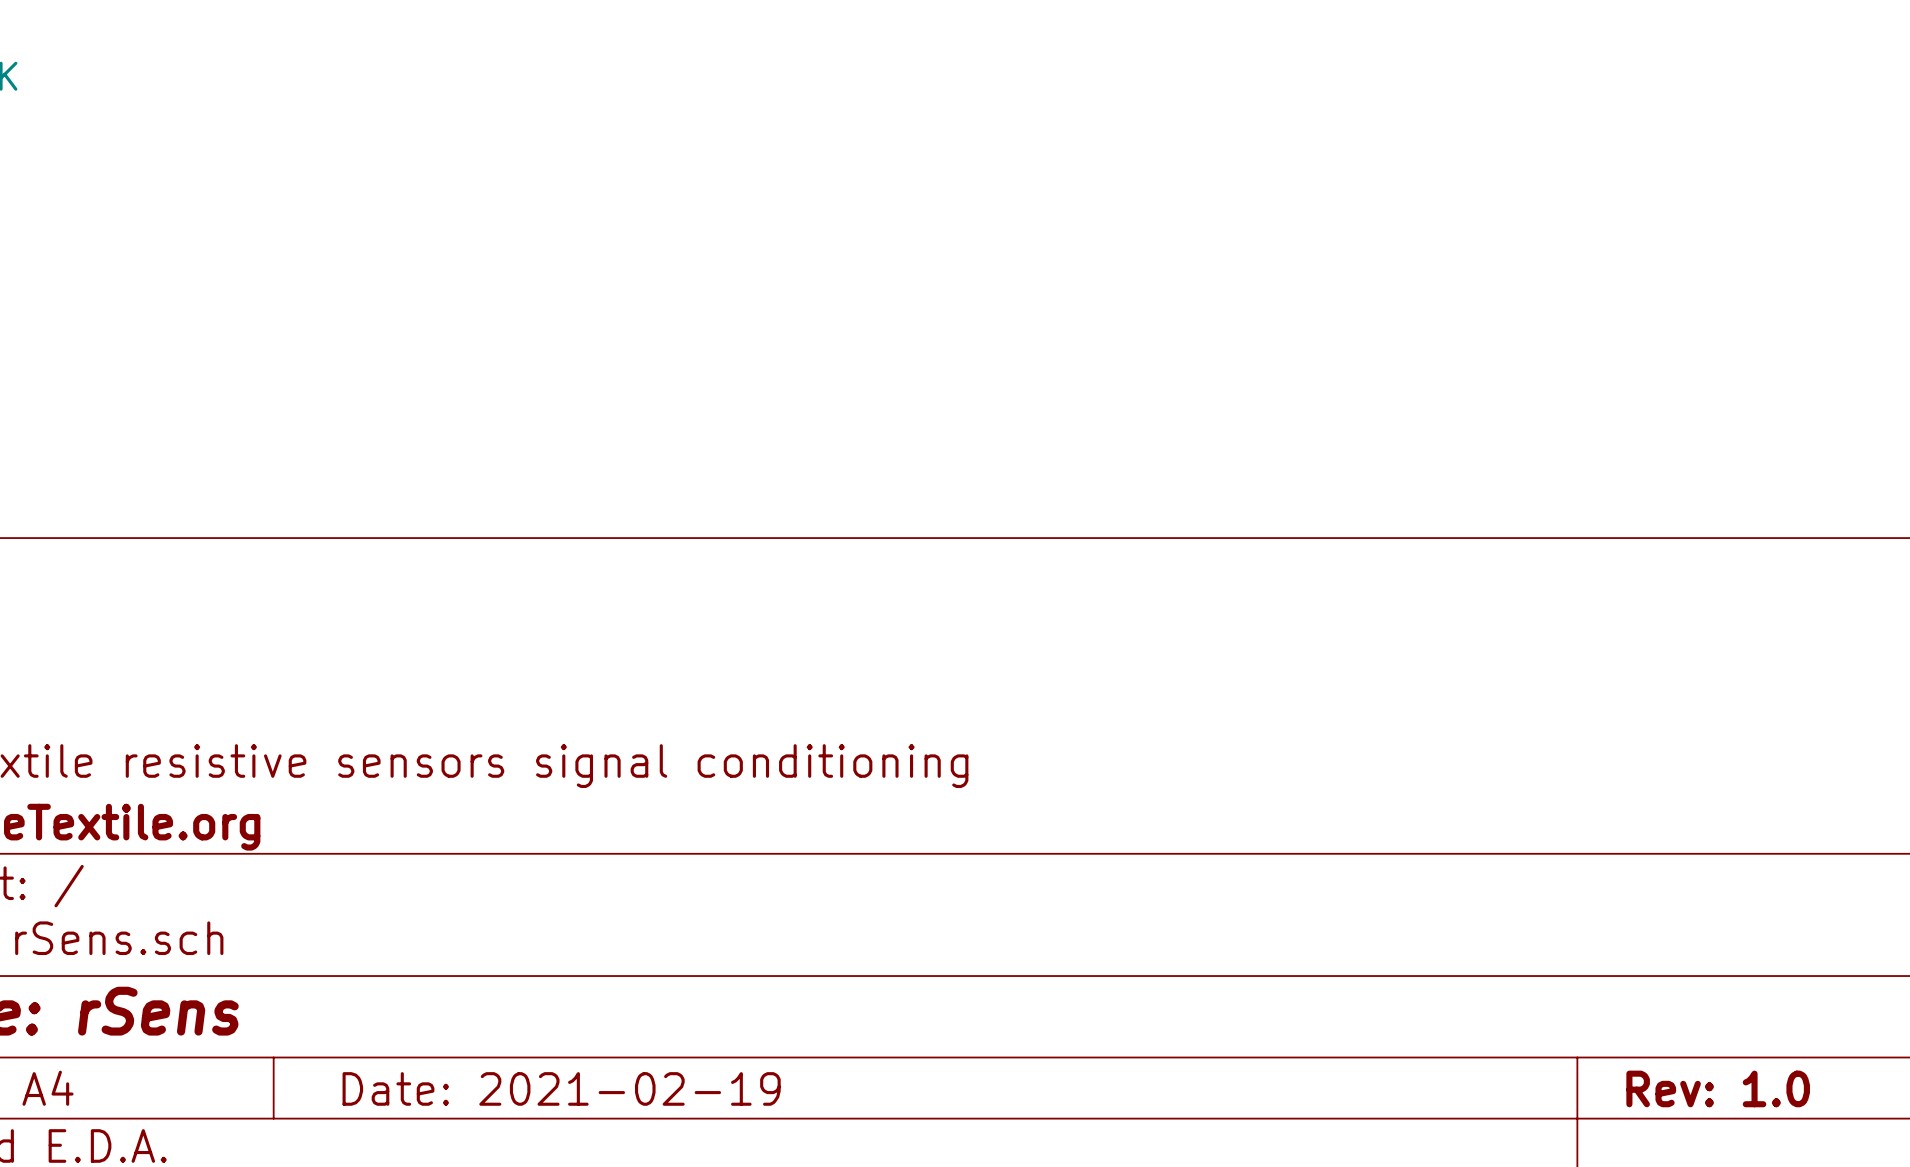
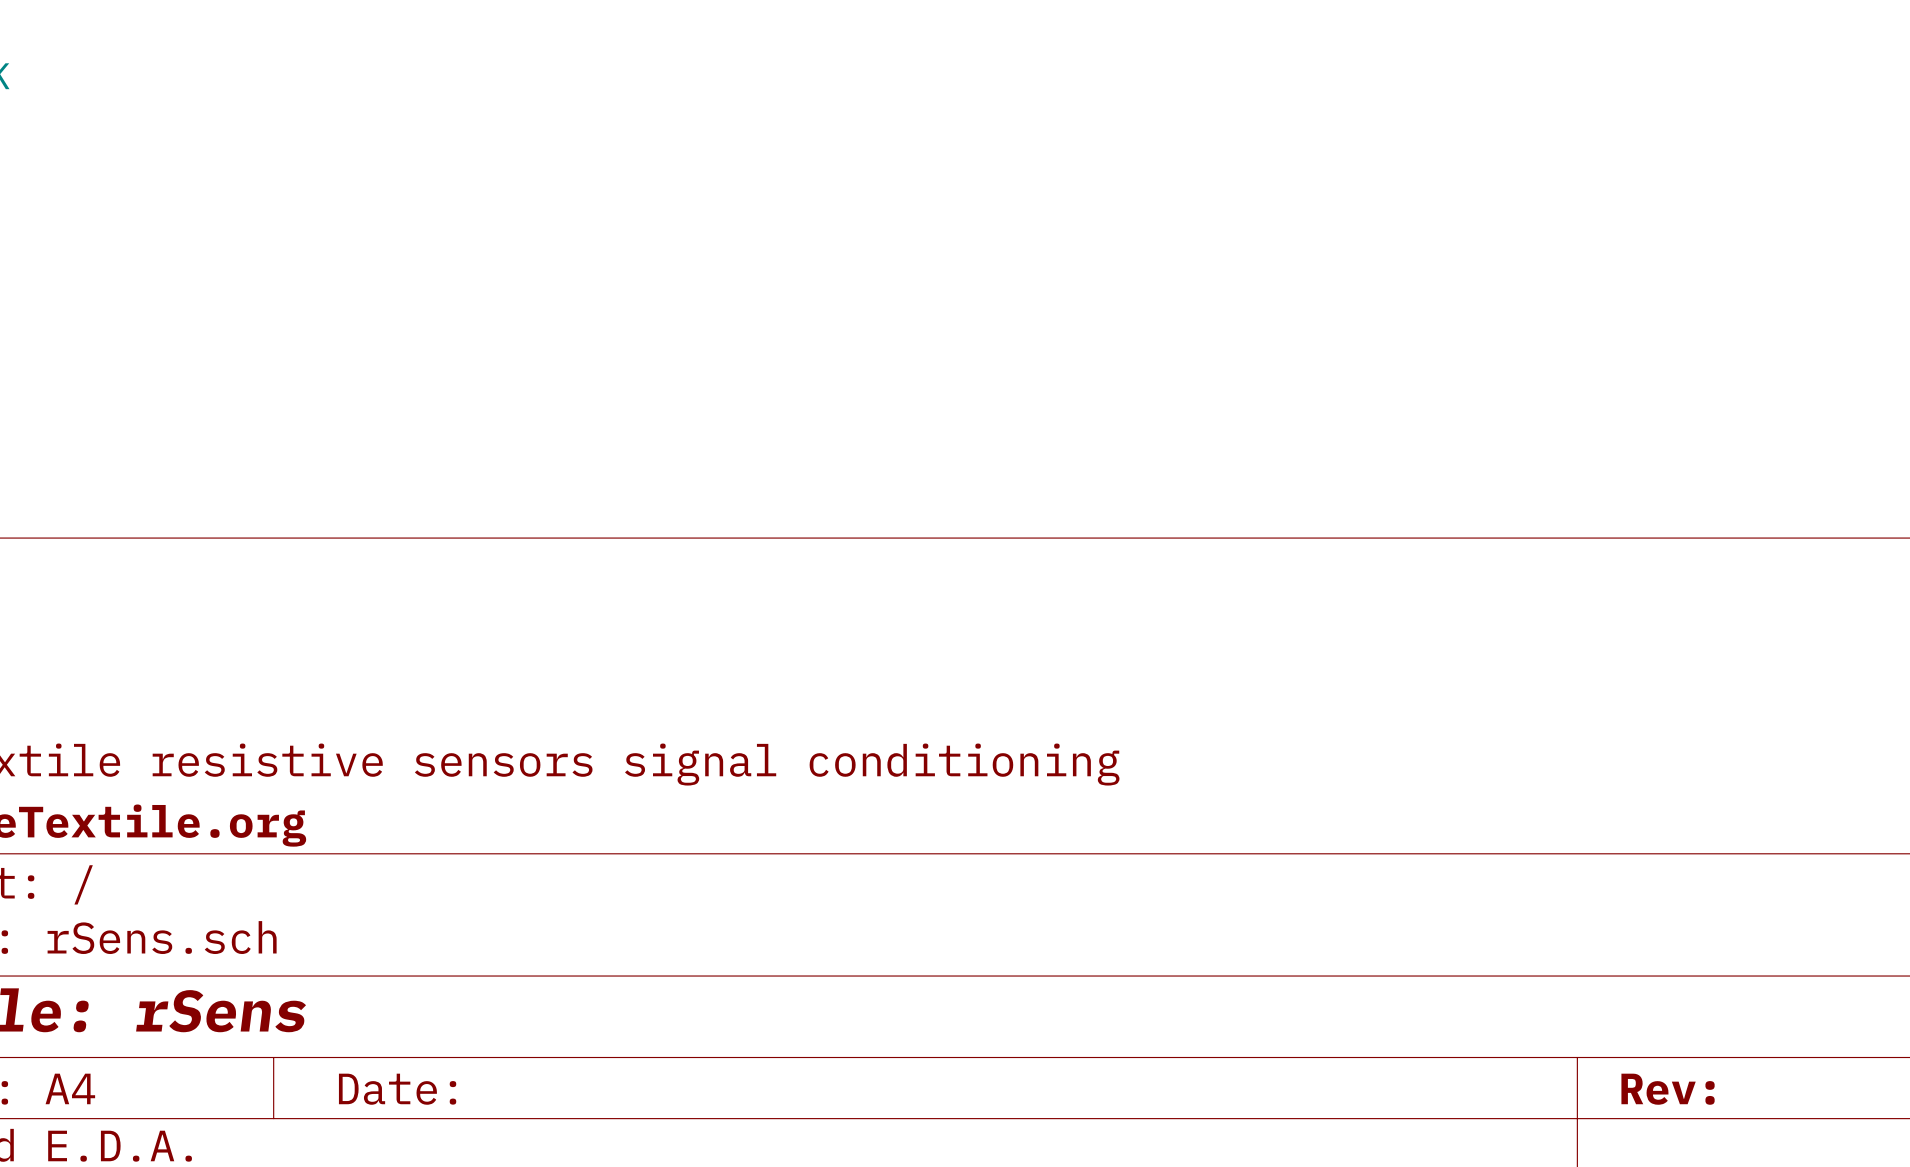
title block: Date: 2021-02-19 (561, 1088) -> Date: (397, 1089)
title block: Rev: 1.0 (1718, 1088) -> Rev: (1668, 1089)

